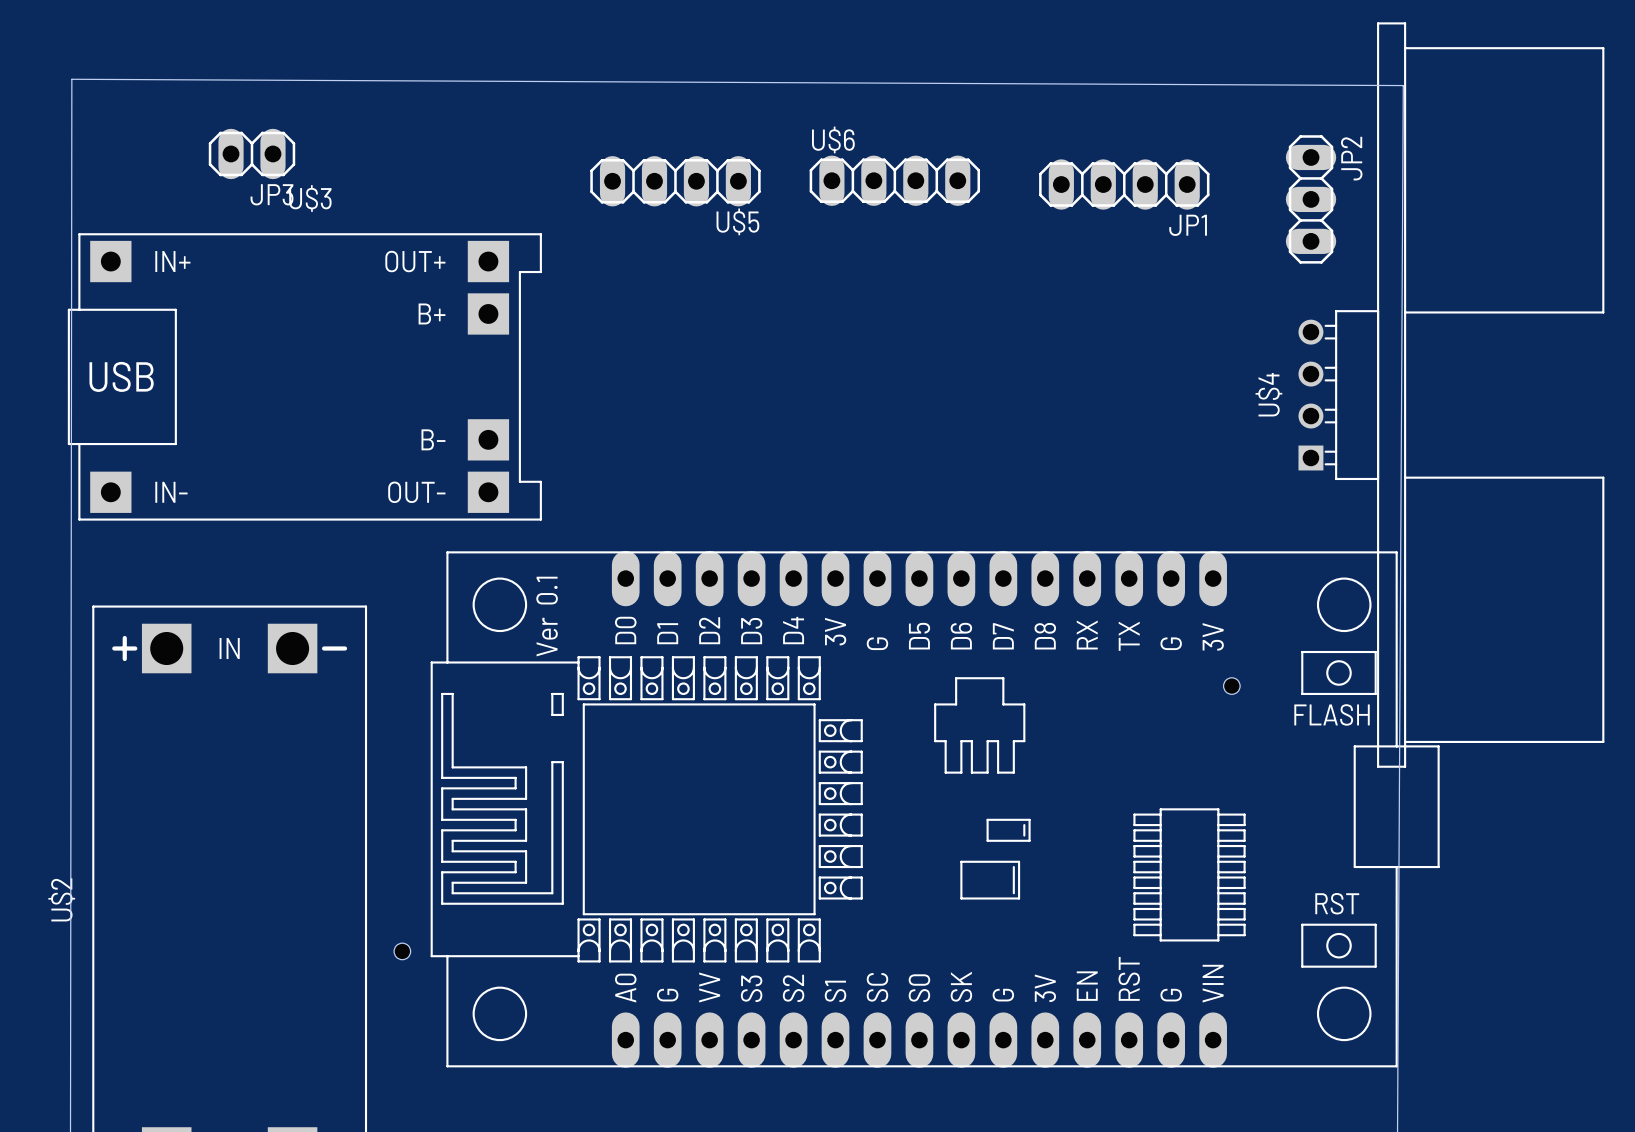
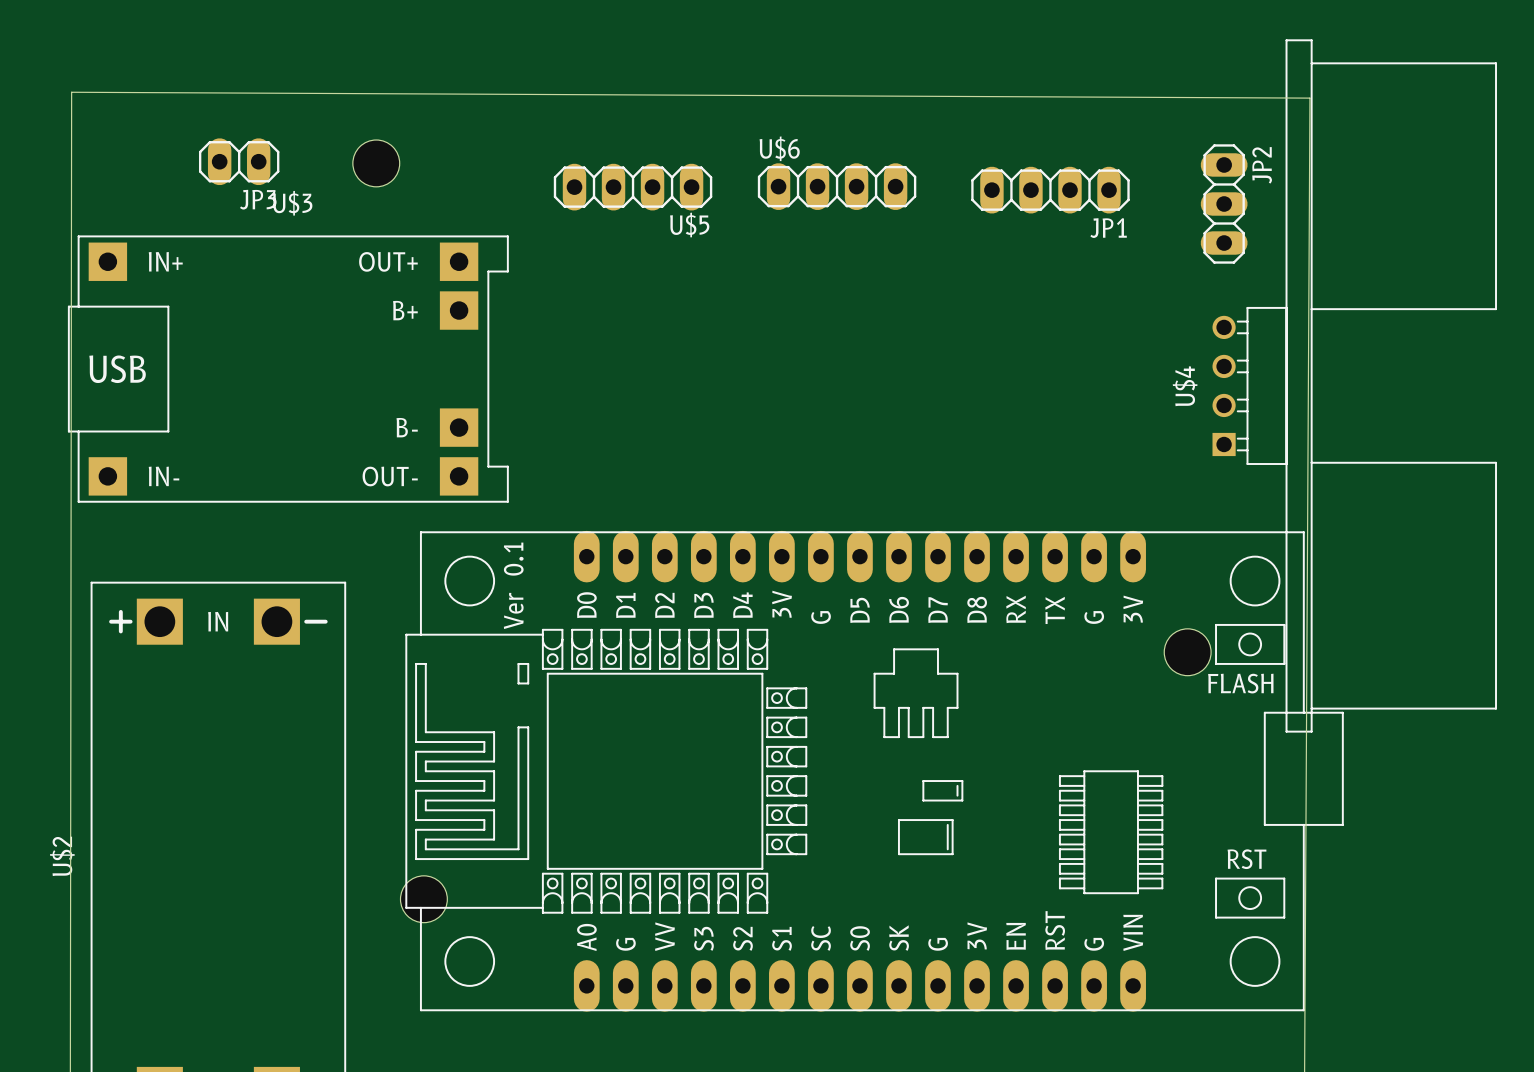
hole: none -> (376, 163)
hole: none -> (1187, 652)
hole: (1231, 686) -> none
hole: none -> (423, 899)
hole: (402, 951) -> none

